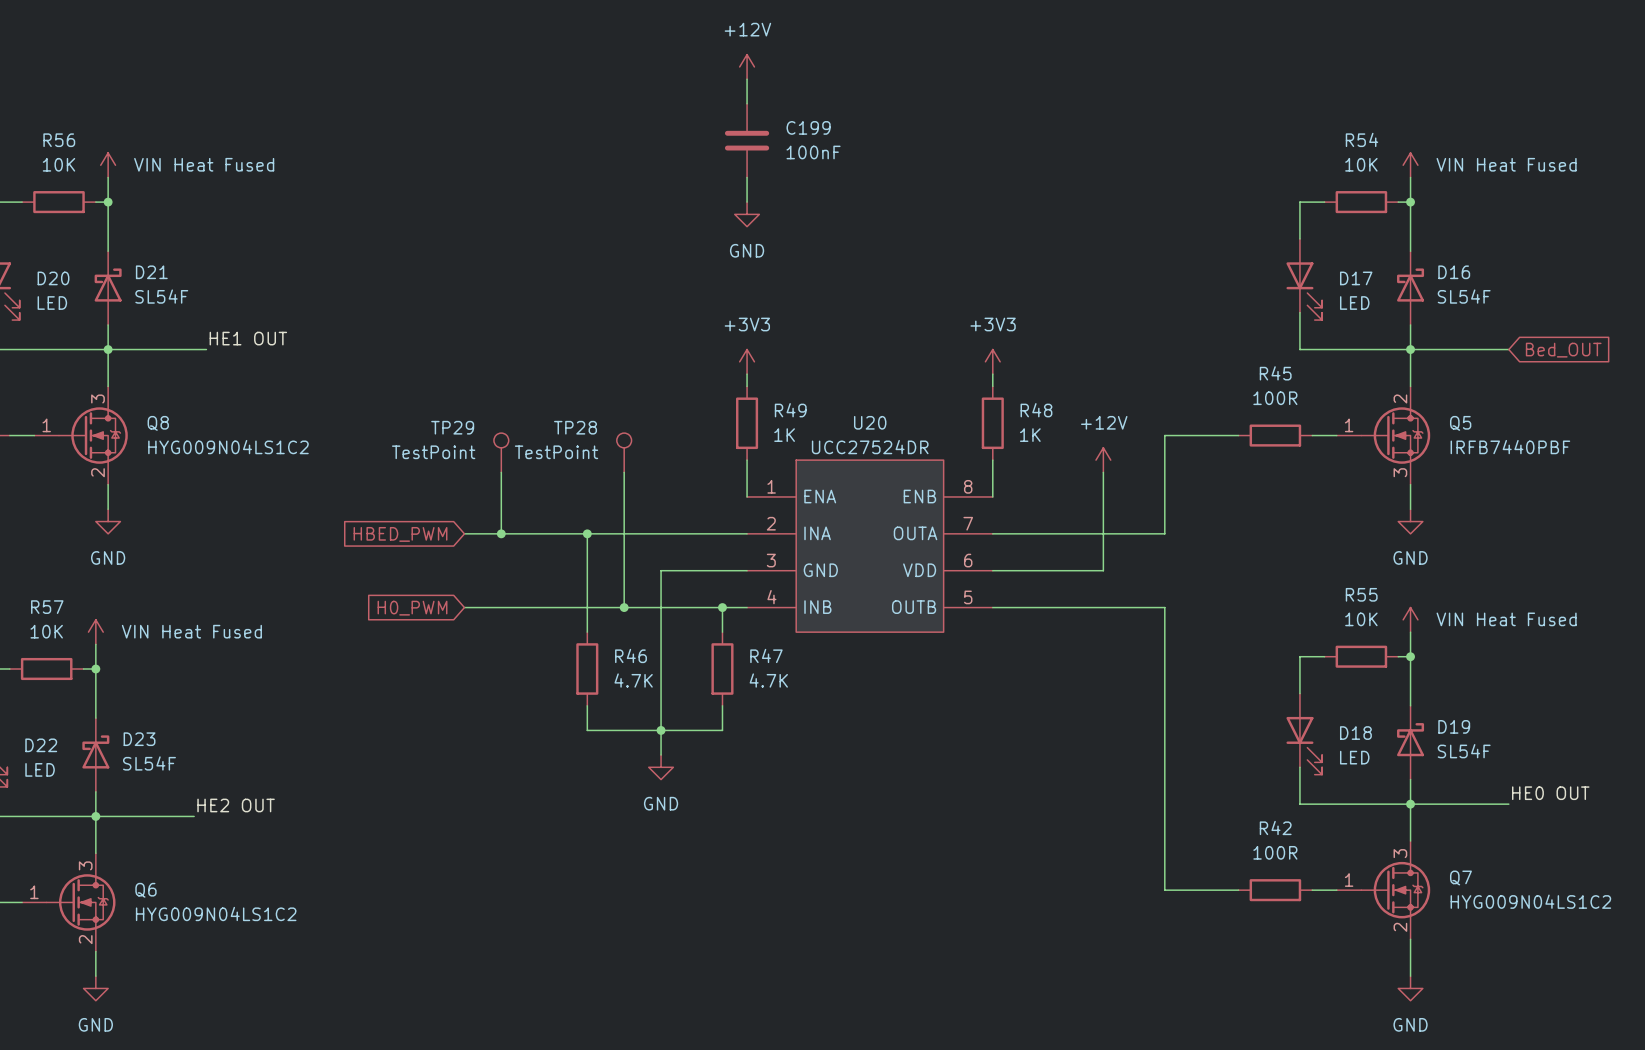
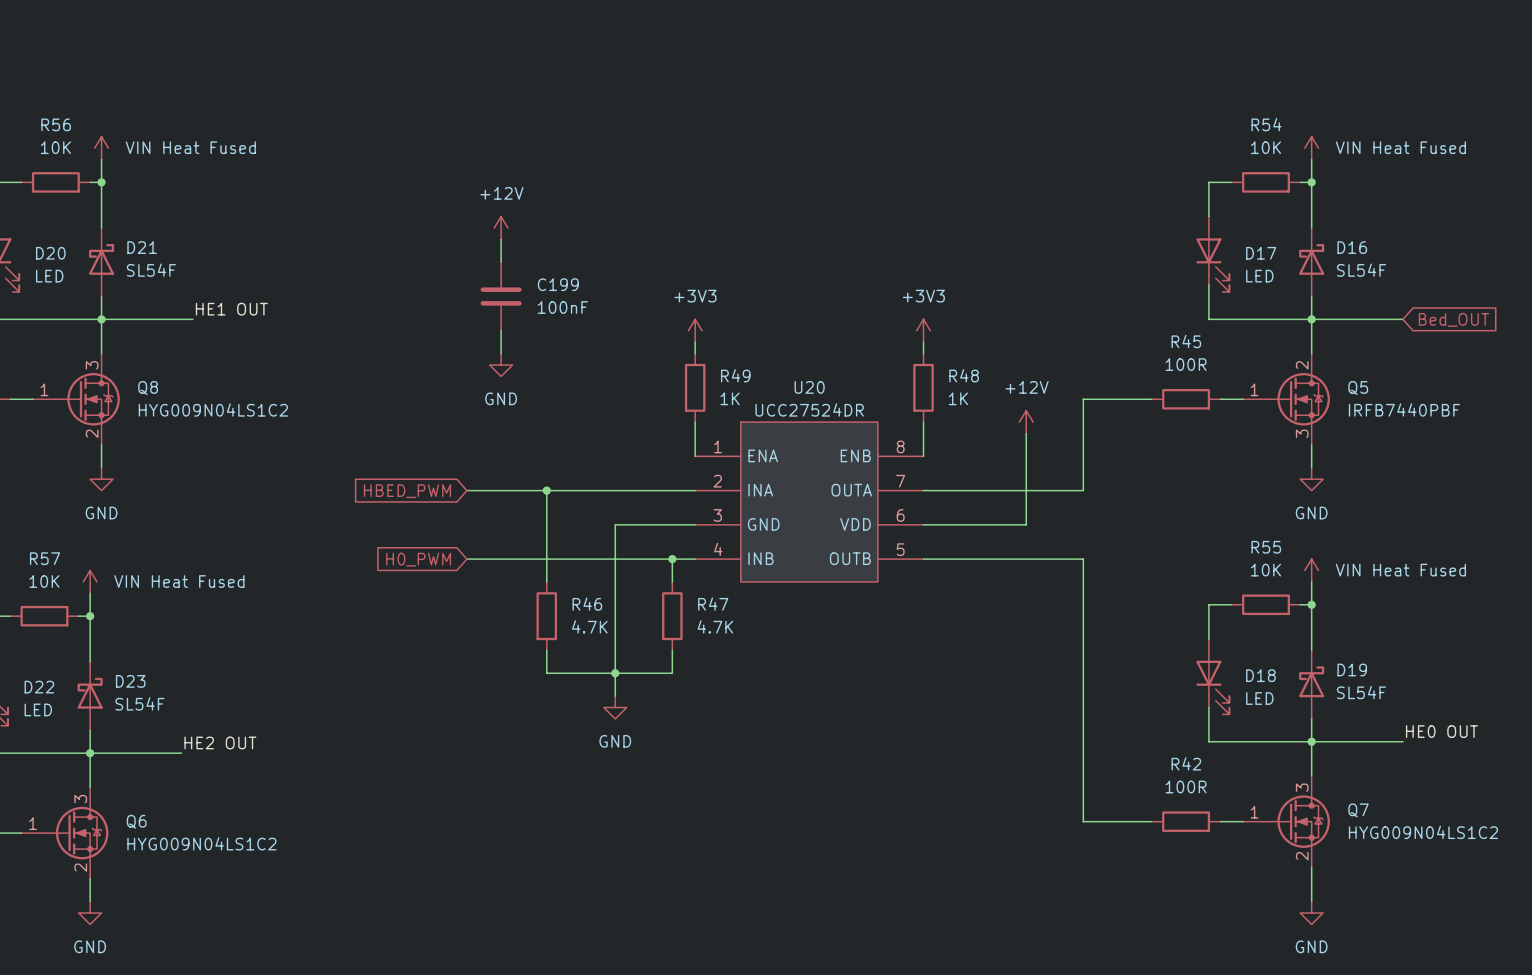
power symbol: +12V (747, 66) -> none
wire: (747, 79) (747, 103) -> none
C199 position: (747, 140) -> (501, 296)
wire: (747, 177) (747, 202) -> (501, 239) (501, 262)
power symbol: GND (747, 214) -> none
power symbol: none -> +12V (501, 228)
wire: none -> (501, 330) (501, 353)
power symbol: none -> GND (501, 365)
TP29: TestPoint (501, 452) -> none
TP28: TestPoint (624, 452) -> none
wire: (501, 472) (501, 533) (464, 533) -> none
wire: (624, 472) (624, 607) -> none
junction: (501, 533) -> none
global label position: HBED_PWM (400, 534) -> HBED_PWM (407, 491)
wire: (464, 607) (501, 607) -> none
junction: (624, 607) -> none
global label position: H0_PWM (412, 608) -> H0_PWM (418, 559)

